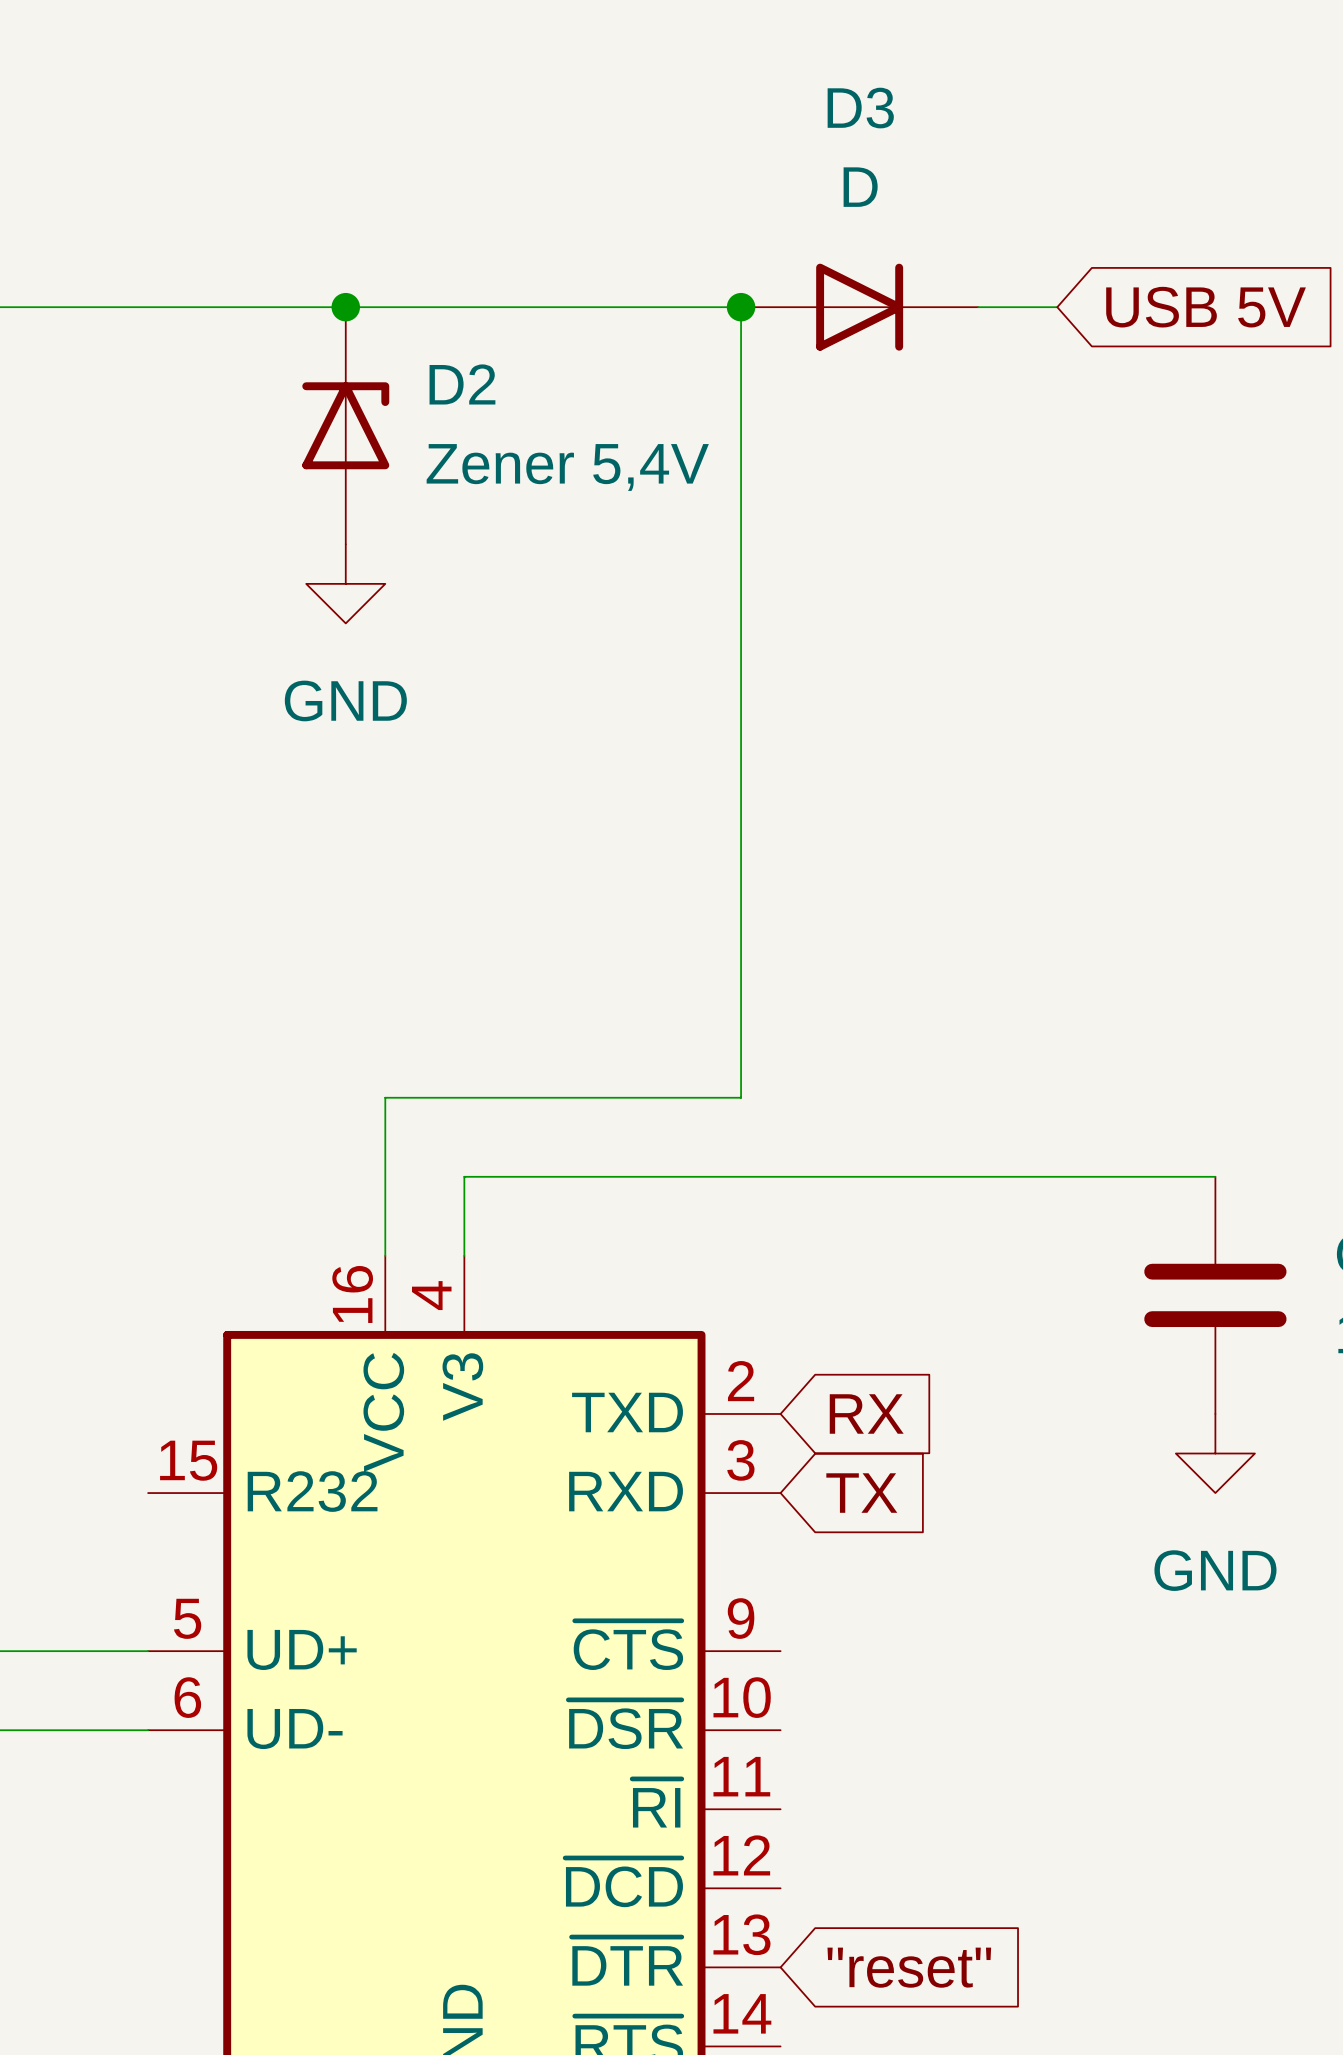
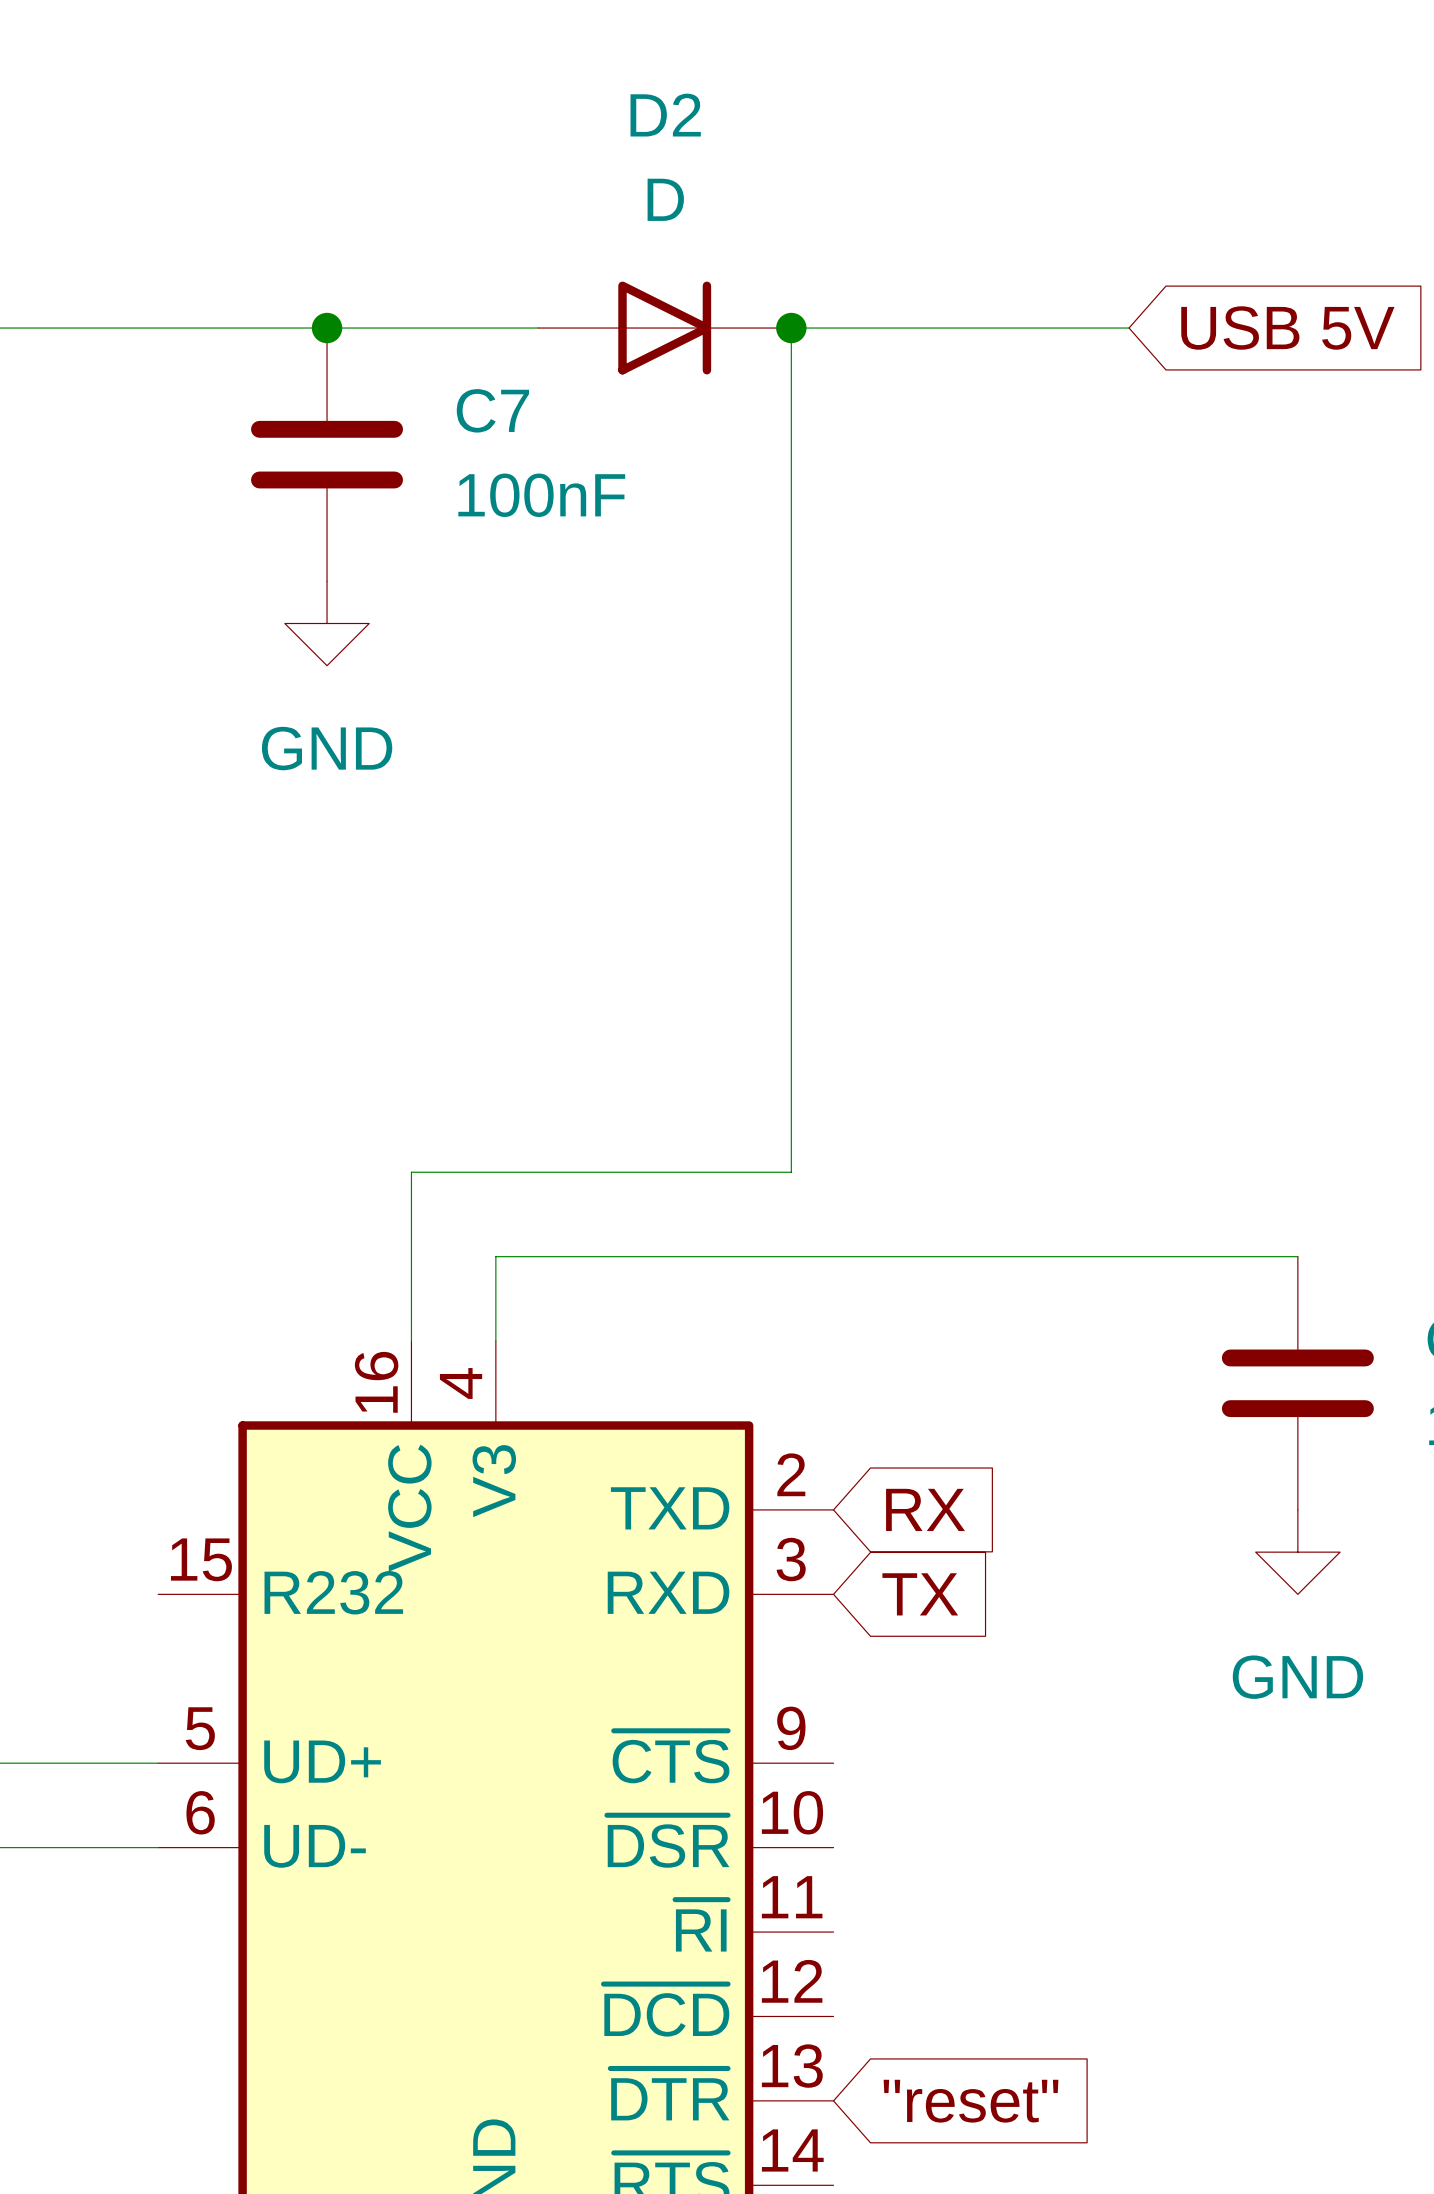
D2 symbol: [302, 307, 390, 545] -> [538, 281, 792, 375]
junction position: (345, 307) -> (327, 328)
D3: D (859, 307) -> none
D2 name position: D2 (462, 384) -> D2 (665, 115)
C7: none -> 100nF (327, 454)
D2 value: Zener 5,4V (567, 467) -> D (665, 199)
power symbol position: GND (345, 583) -> GND (327, 623)

